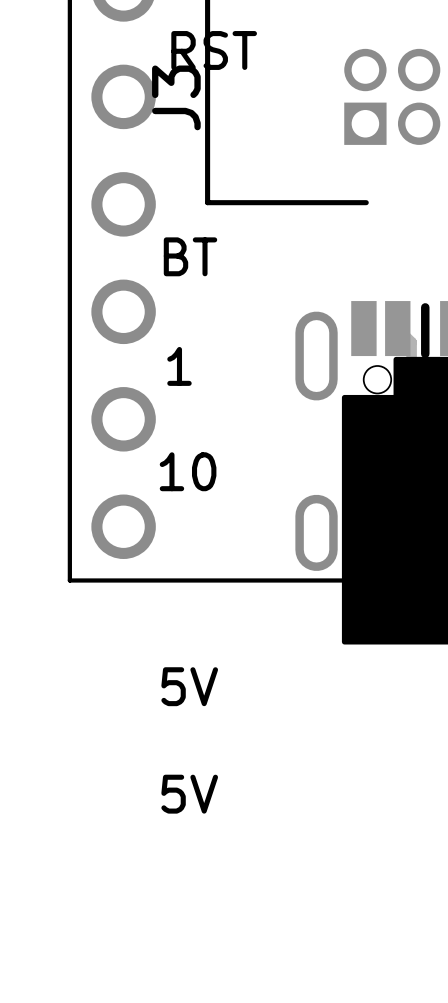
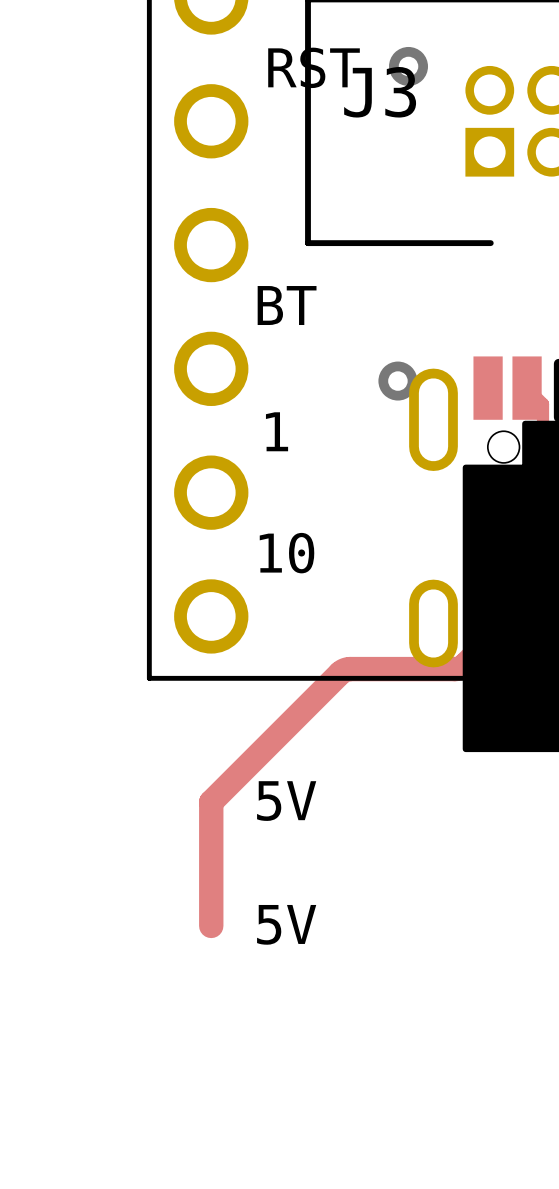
via: none -> (408, 66)
J3 name rotation: 0° (176, 97) -> 90° clockwise (380, 92)
via: none -> (397, 381)
track: none -> (480, 649) (464, 665) (457, 668) (350, 669) (343, 670) (211, 802) (211, 925)

